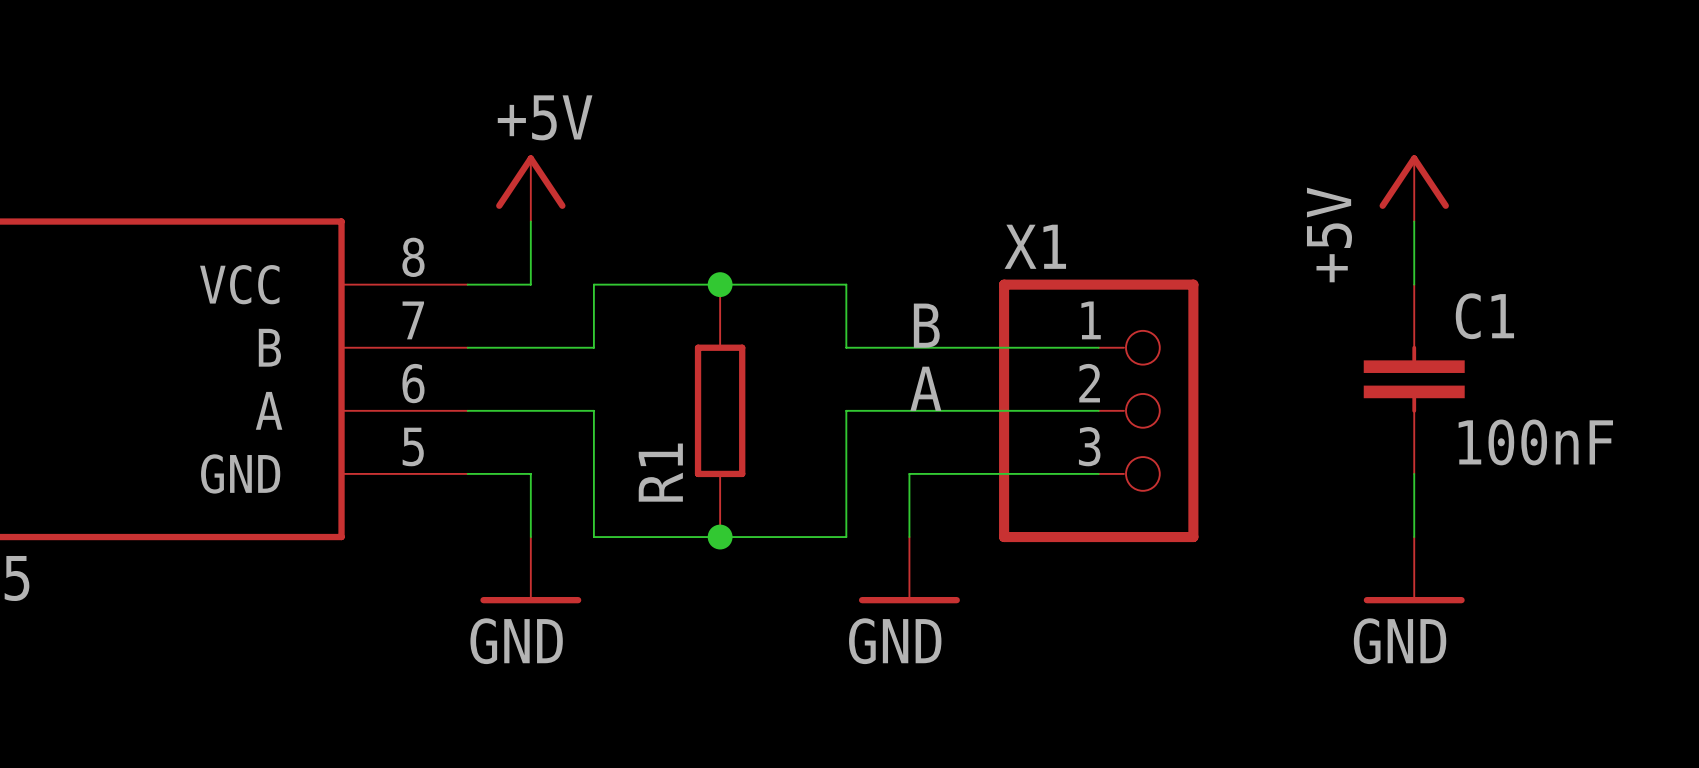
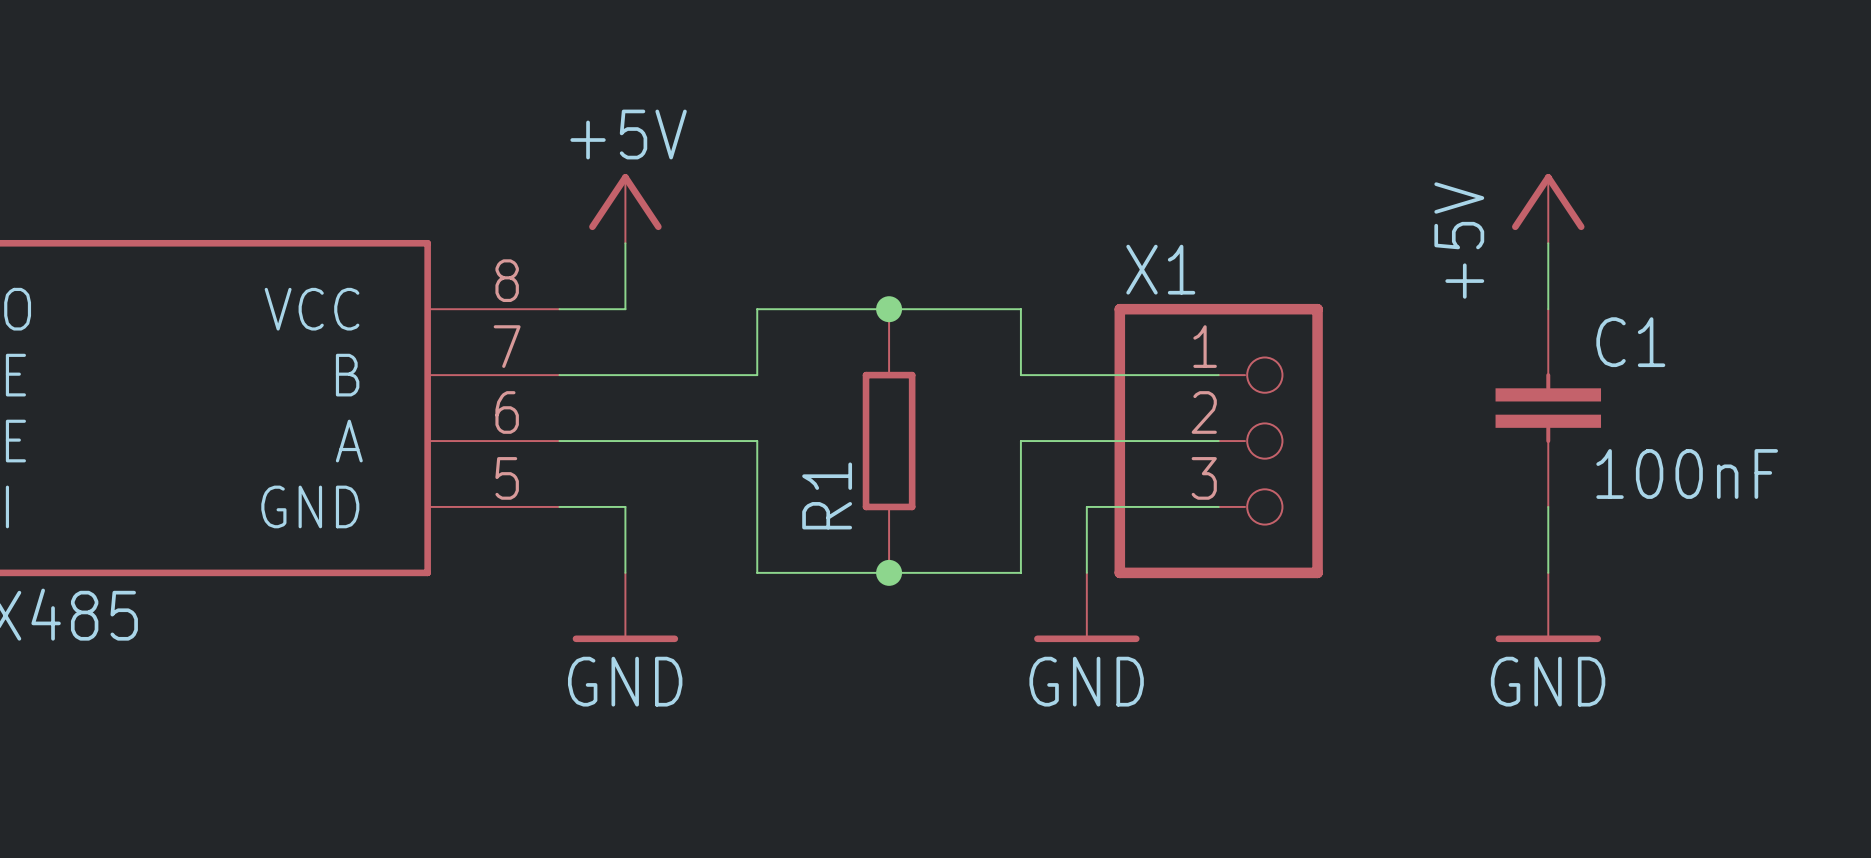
wire: (657, 284) (593, 284) (593, 347) -> (757, 309) (757, 375) (691, 375)
junction position: (720, 284) -> (889, 309)
wire: (846, 284) (846, 347) (909, 347) -> (955, 309) (1020, 309) (1020, 375)
label: B (926, 325) -> none
label: A (925, 388) -> none
wire: (593, 410) (593, 537) (657, 537) -> (691, 441) (757, 441) (757, 572)
R1 position: (720, 410) -> (889, 441)
wire: (909, 410) (846, 410) (846, 537) -> (1020, 572) (955, 572)
wire: (909, 473) (972, 473) -> (1020, 506) (1020, 441)
wire: none -> (1086, 506) (1086, 572)
junction position: (720, 537) -> (889, 572)
power symbol position: GND (909, 570) -> GND (1086, 607)

